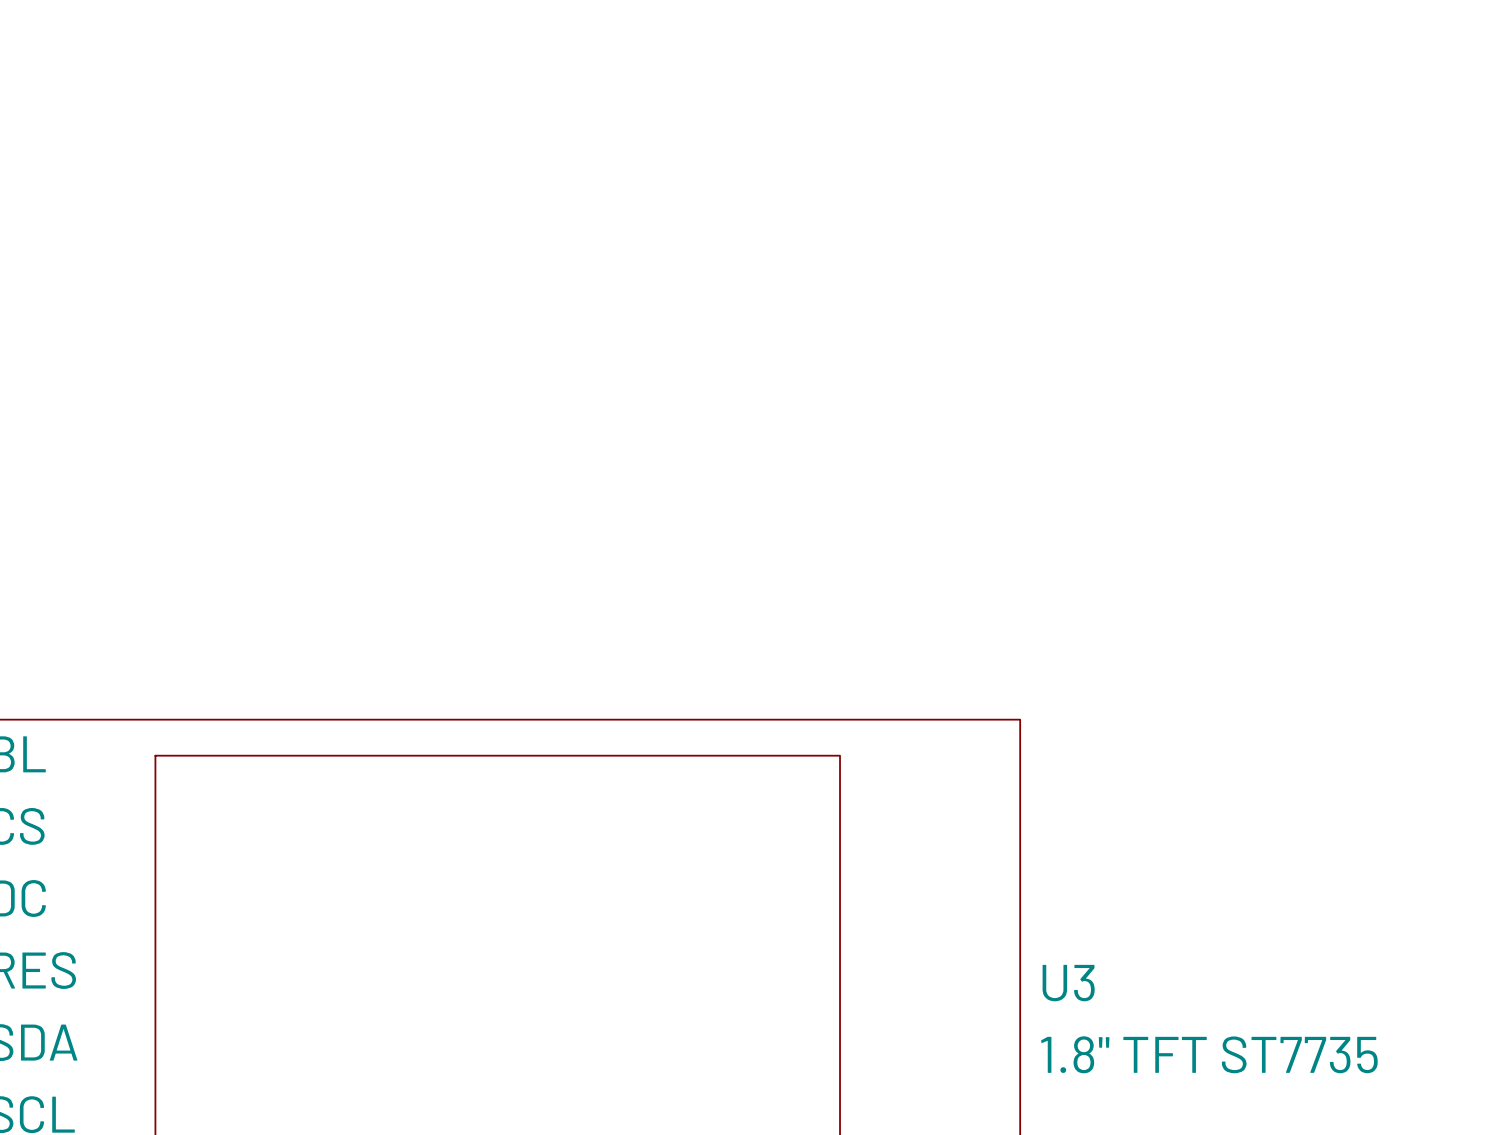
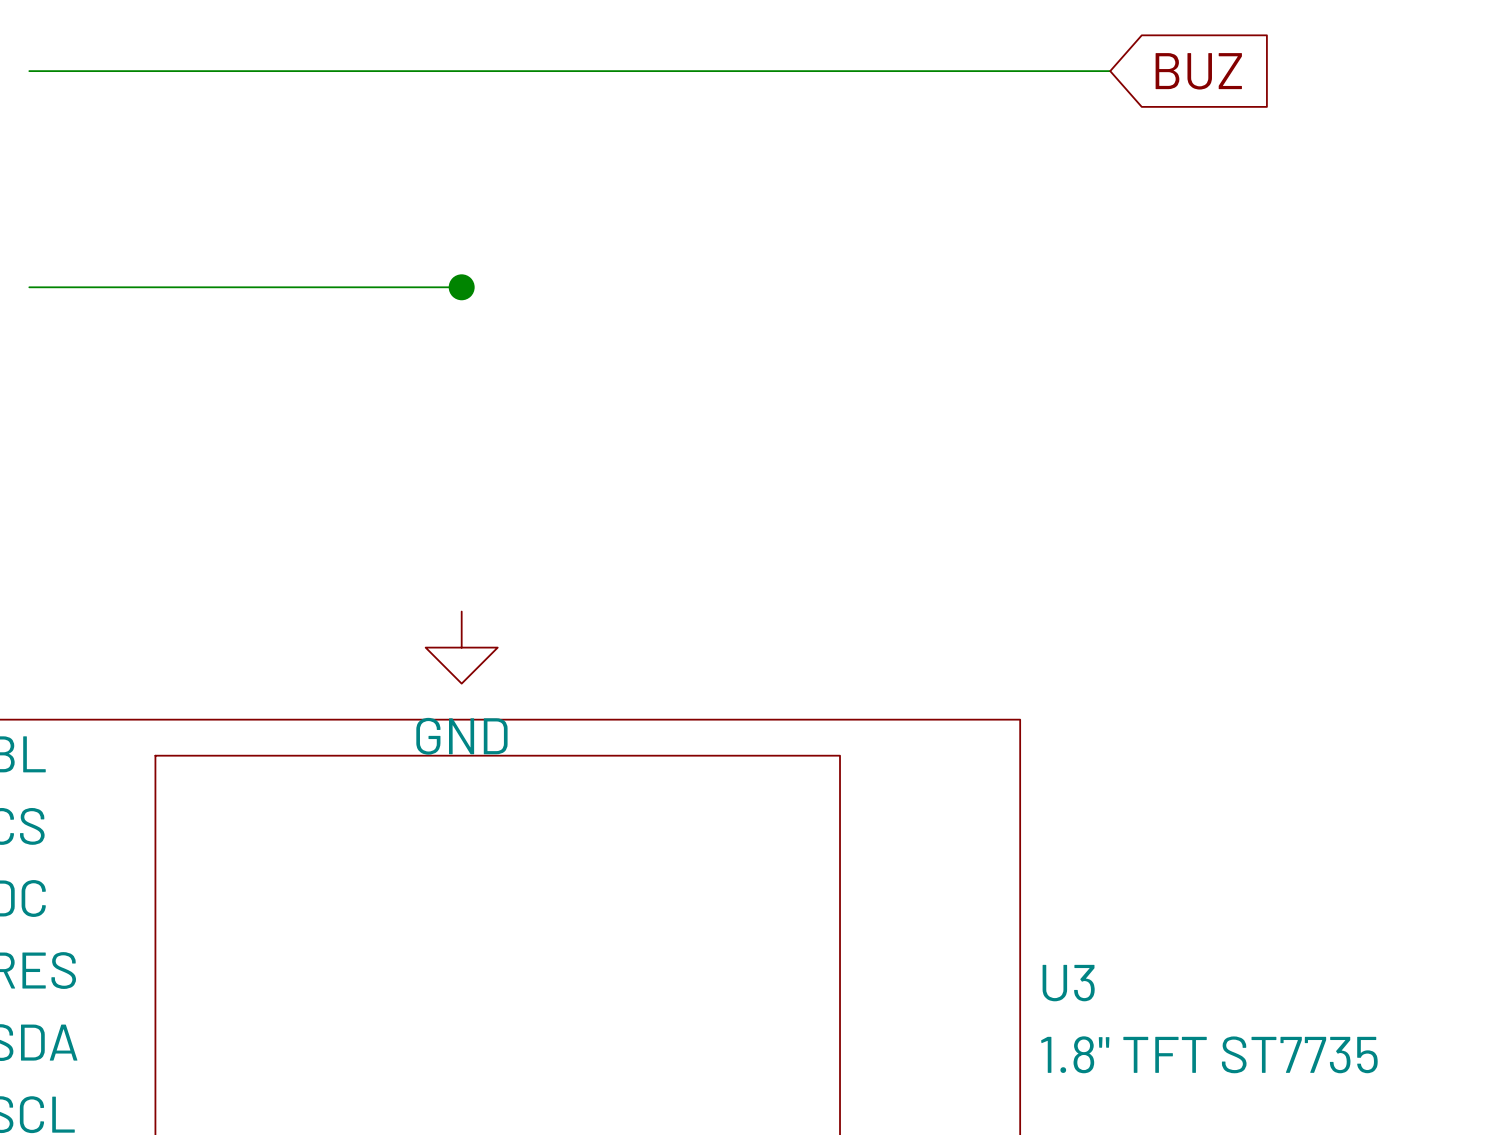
wire: none -> (29, 71) (1110, 71)
global label: none -> BUZ (1198, 71)
wire: none -> (29, 287) (461, 287)
junction: none -> (461, 287)
power symbol: none -> GND (461, 647)

